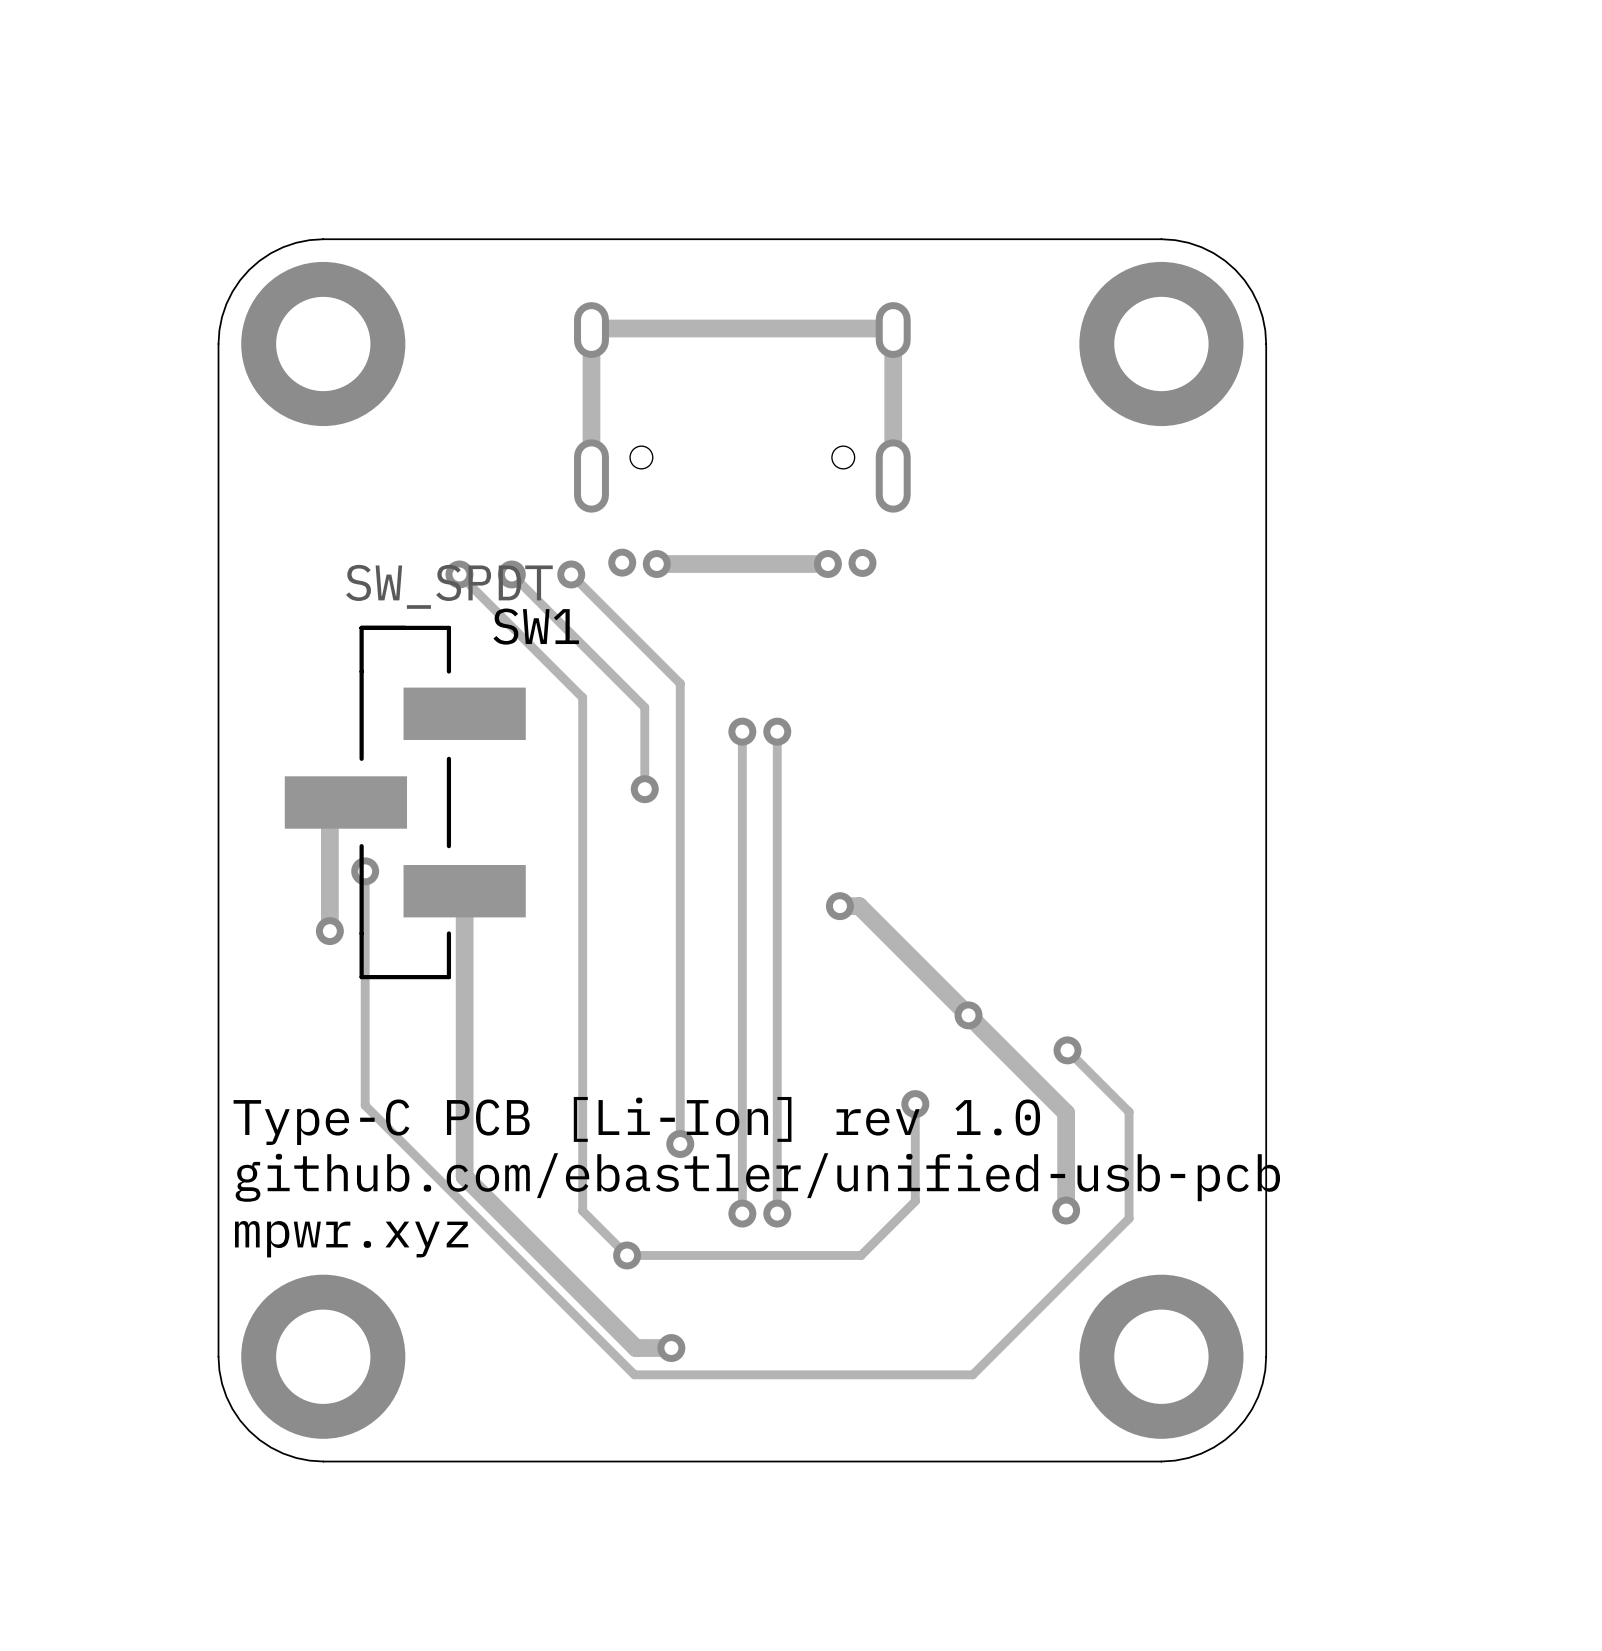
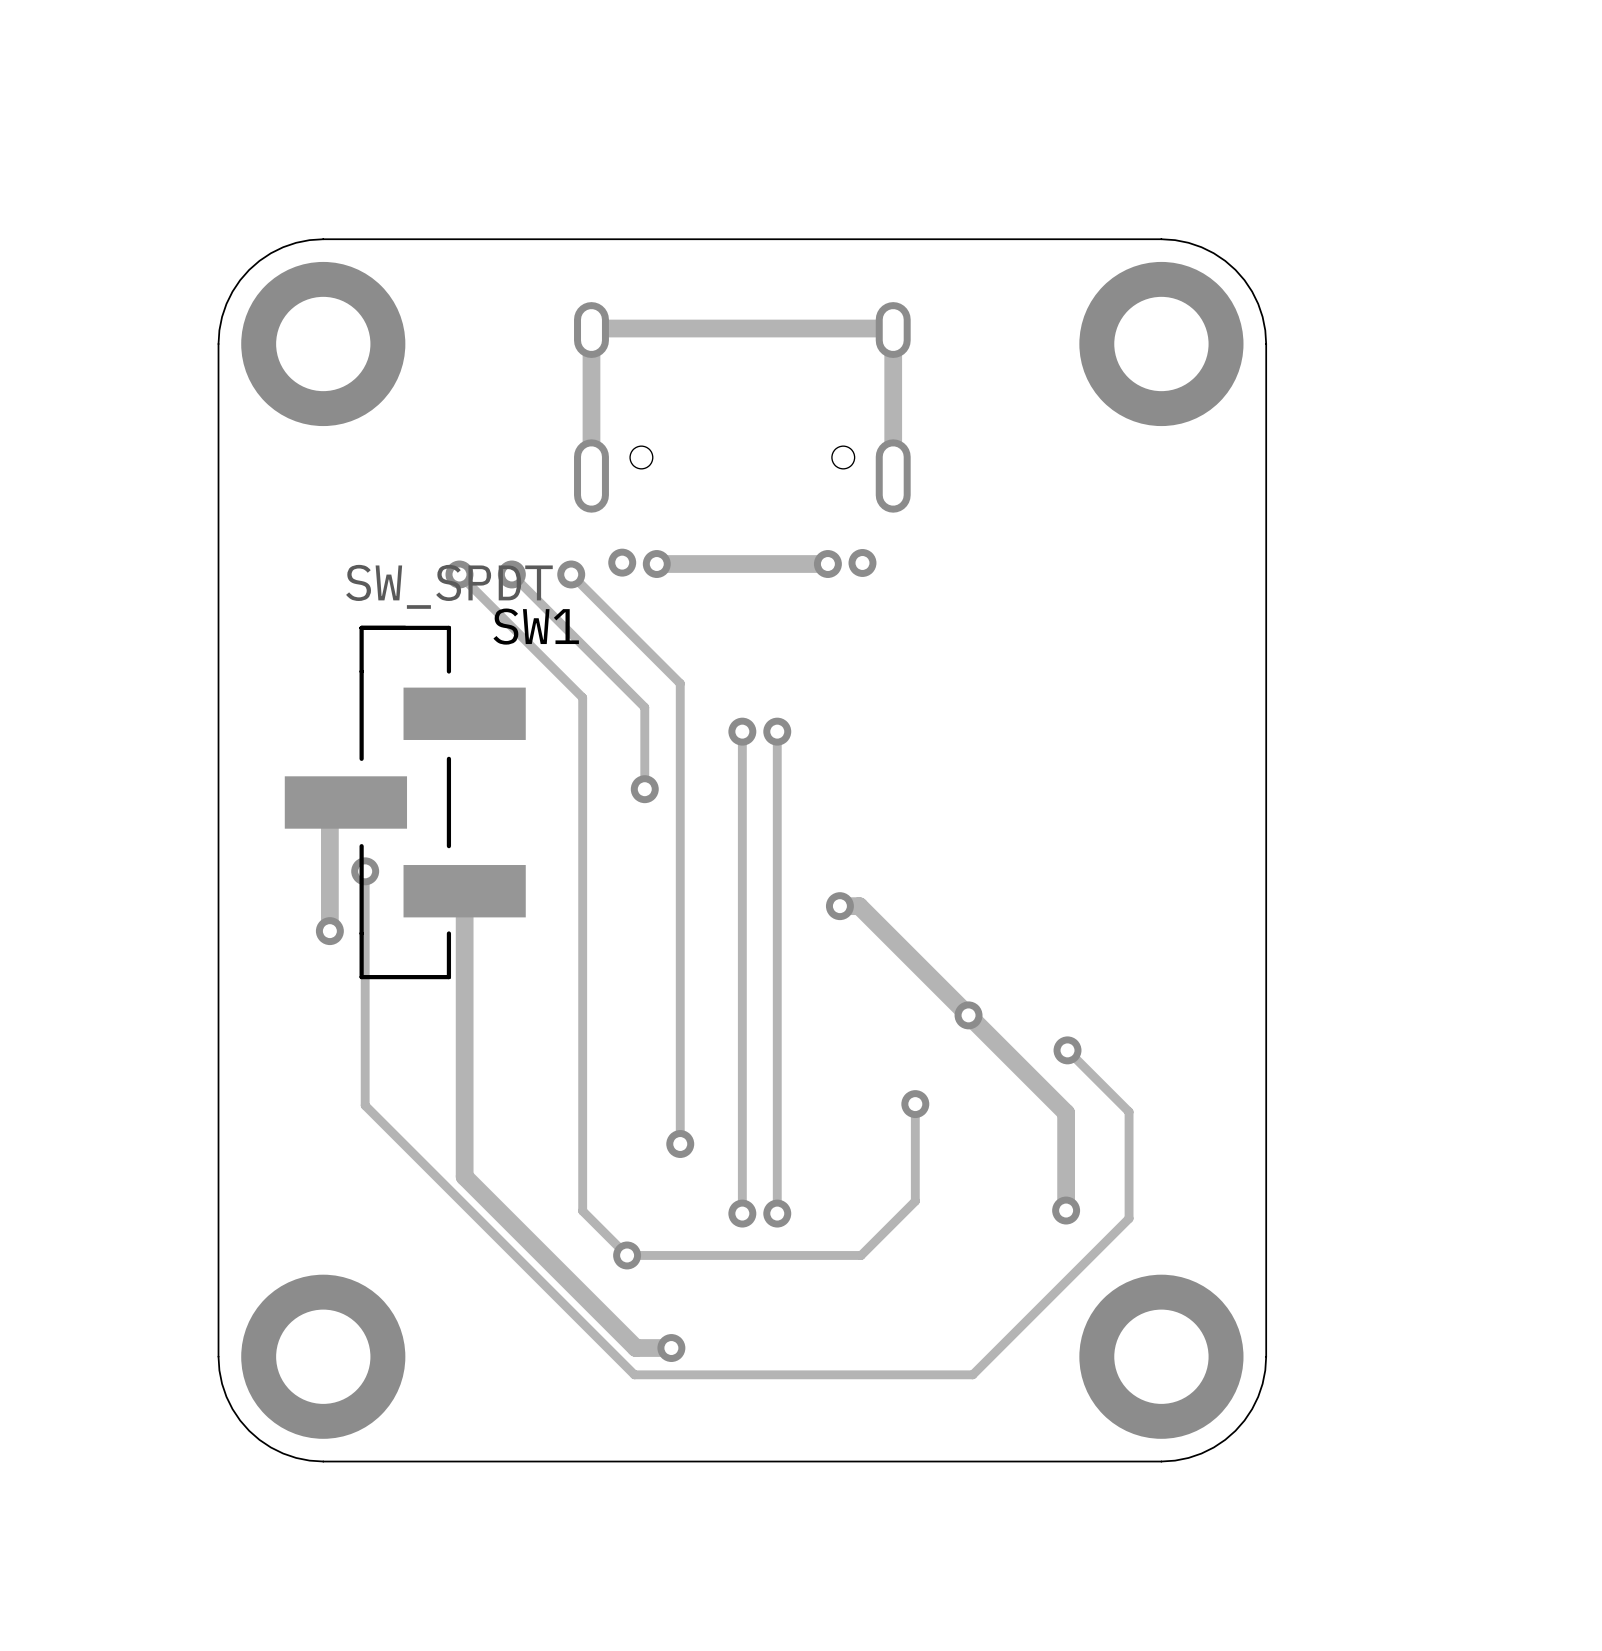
text: Type-C PCB [Li-Ion] rev 1.0 (636, 1120) -> none
text: github.com/ebastler/unified-usb-pcb (757, 1177) -> none
text: mpwr.xyz (351, 1239) -> none

